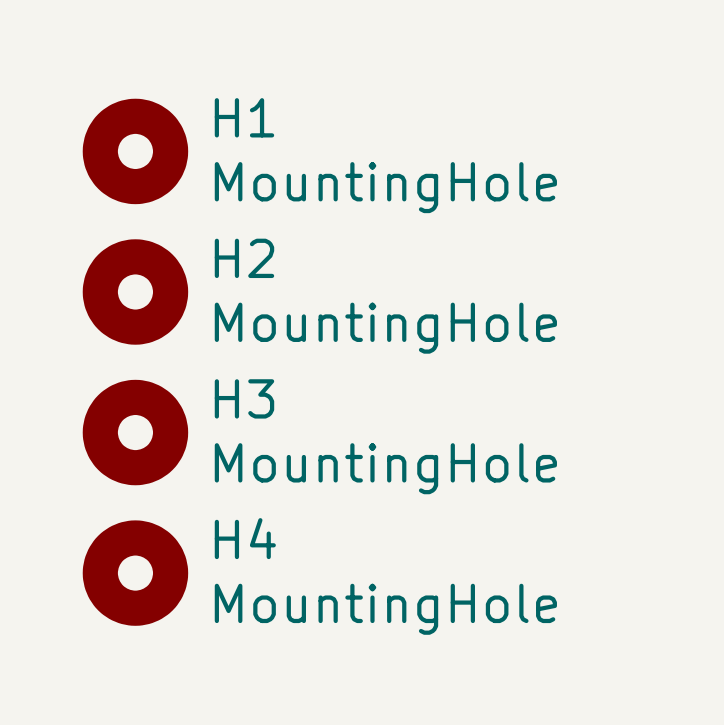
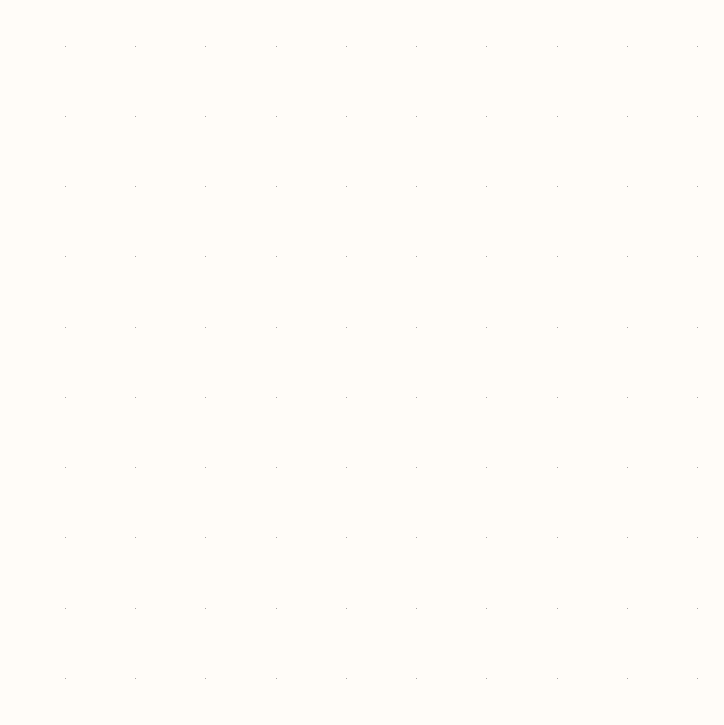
H1: MountingHole (135, 151) -> none
H2: MountingHole (135, 291) -> none
H3: MountingHole (135, 432) -> none
H4: MountingHole (135, 573) -> none

